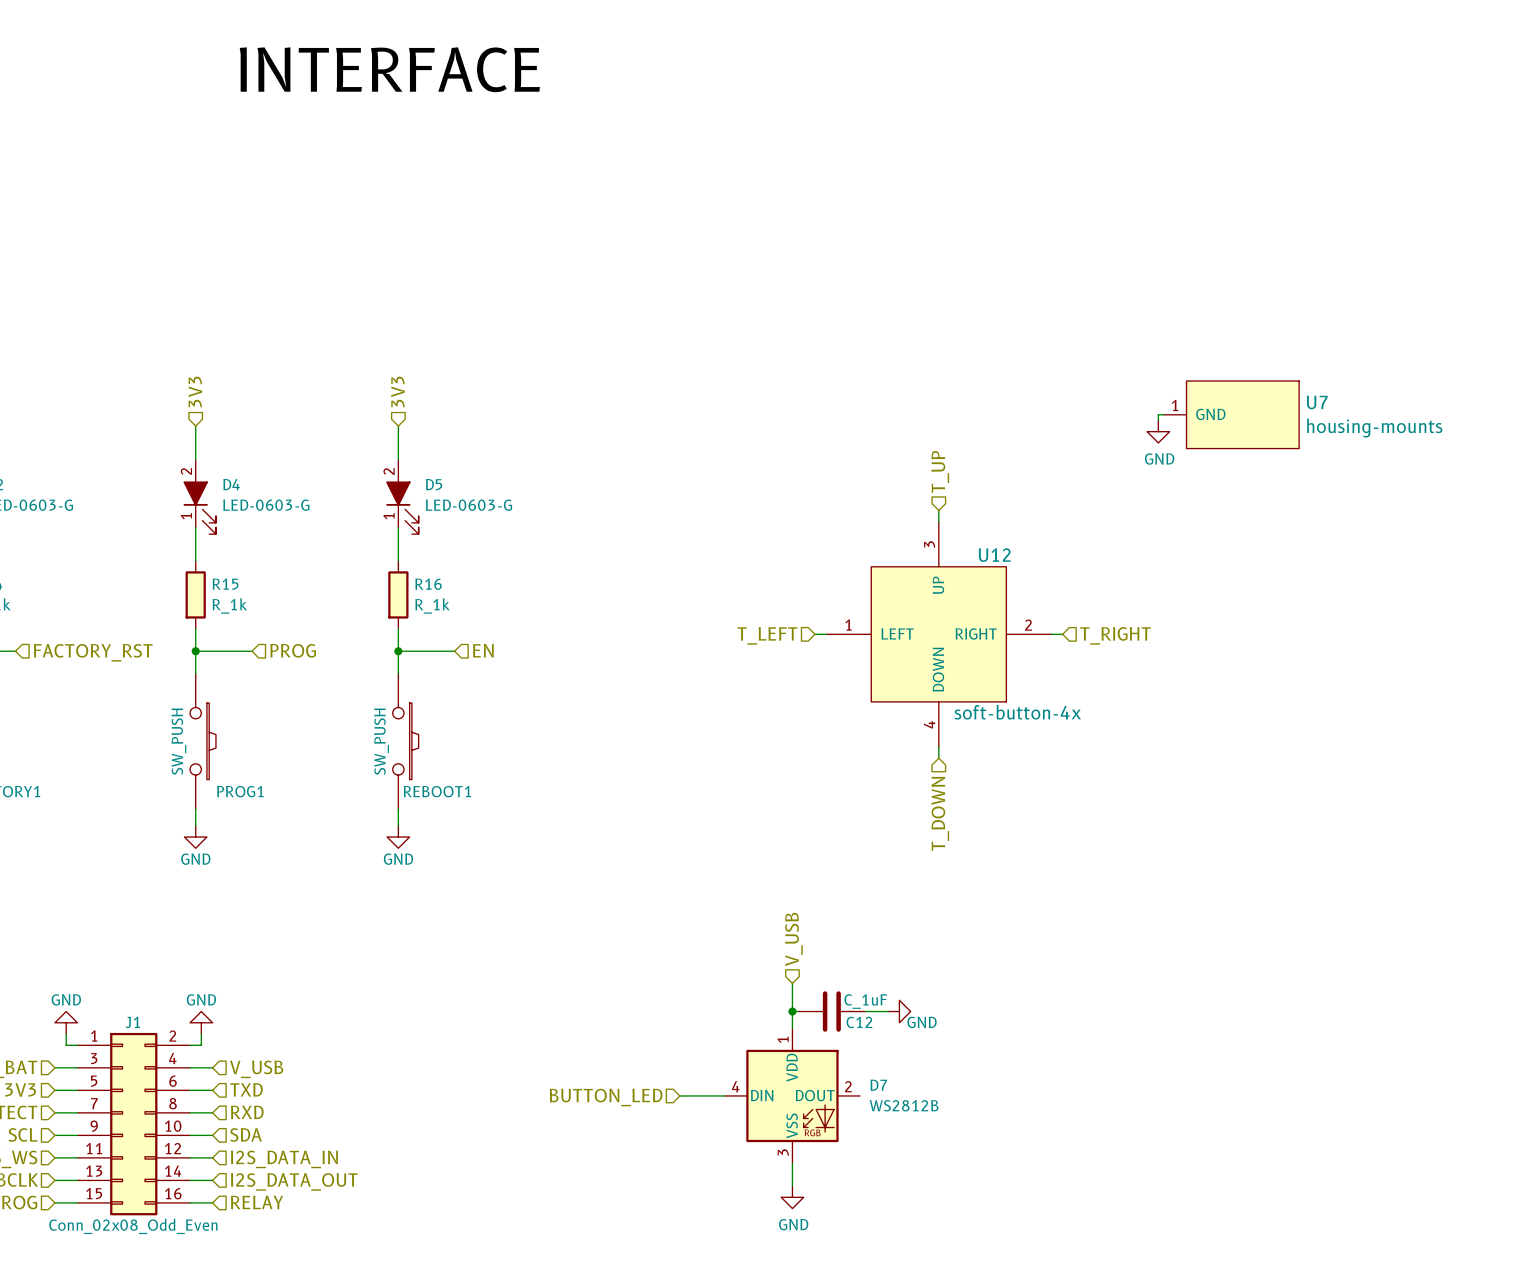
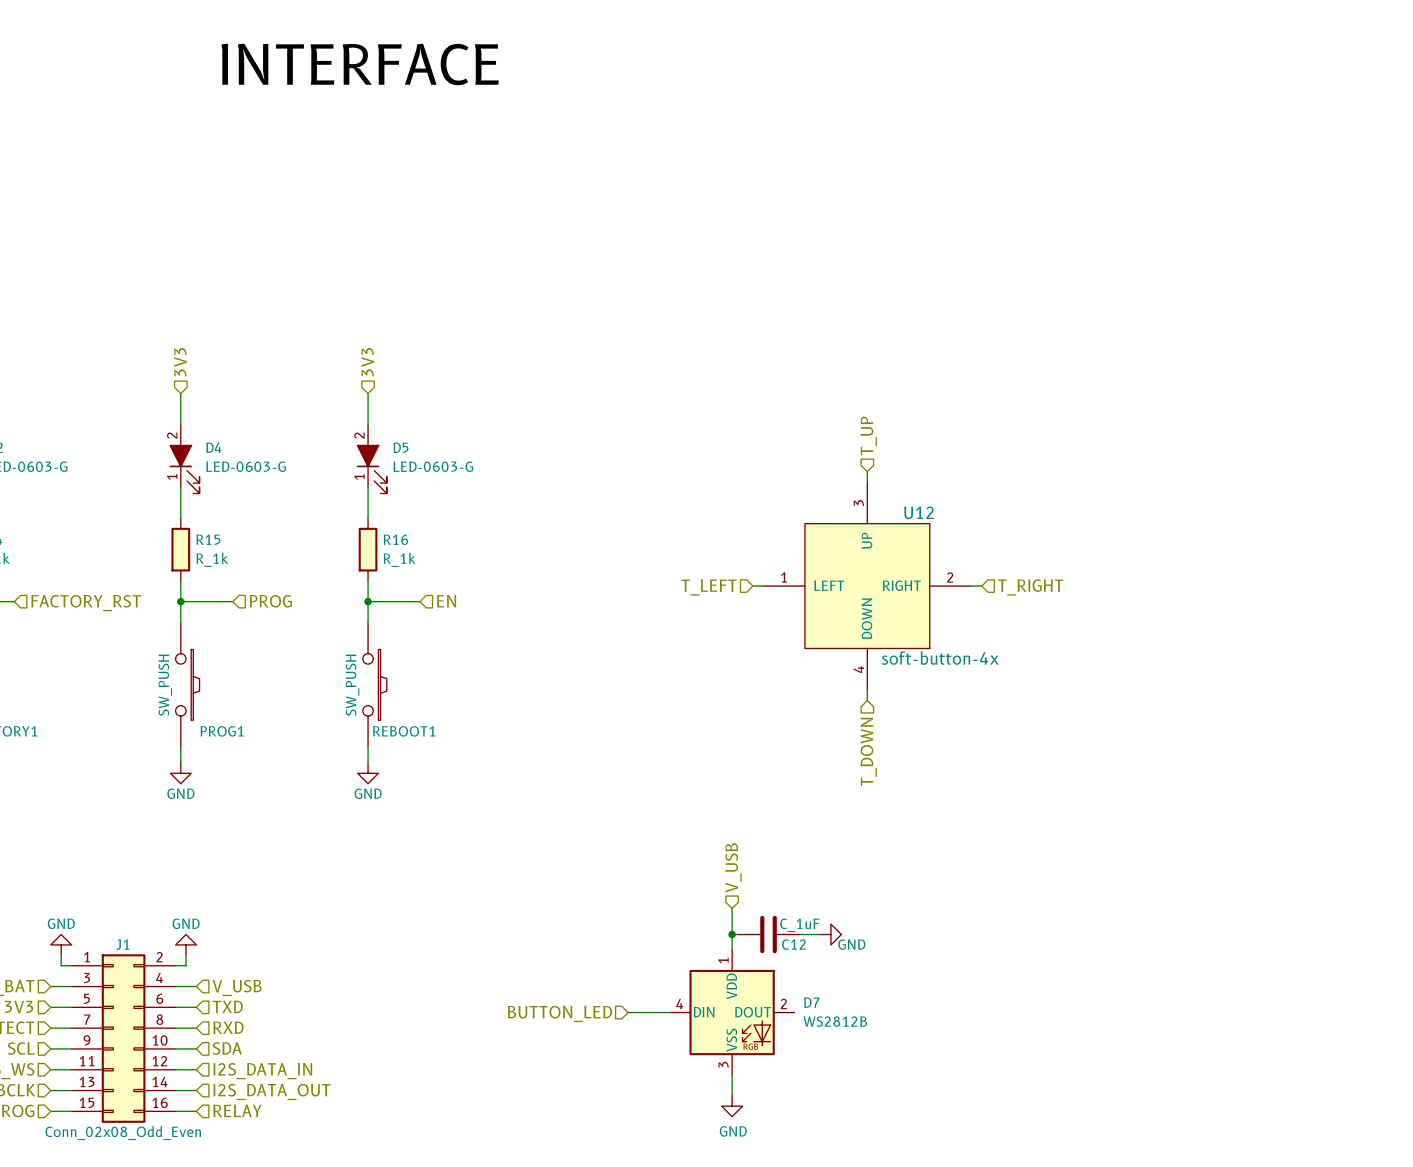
wire: (1164, 414) (1158, 414) (1158, 420) -> none
U7: housing-mounts (1231, 414) -> none
power symbol: GND (1158, 431) -> none

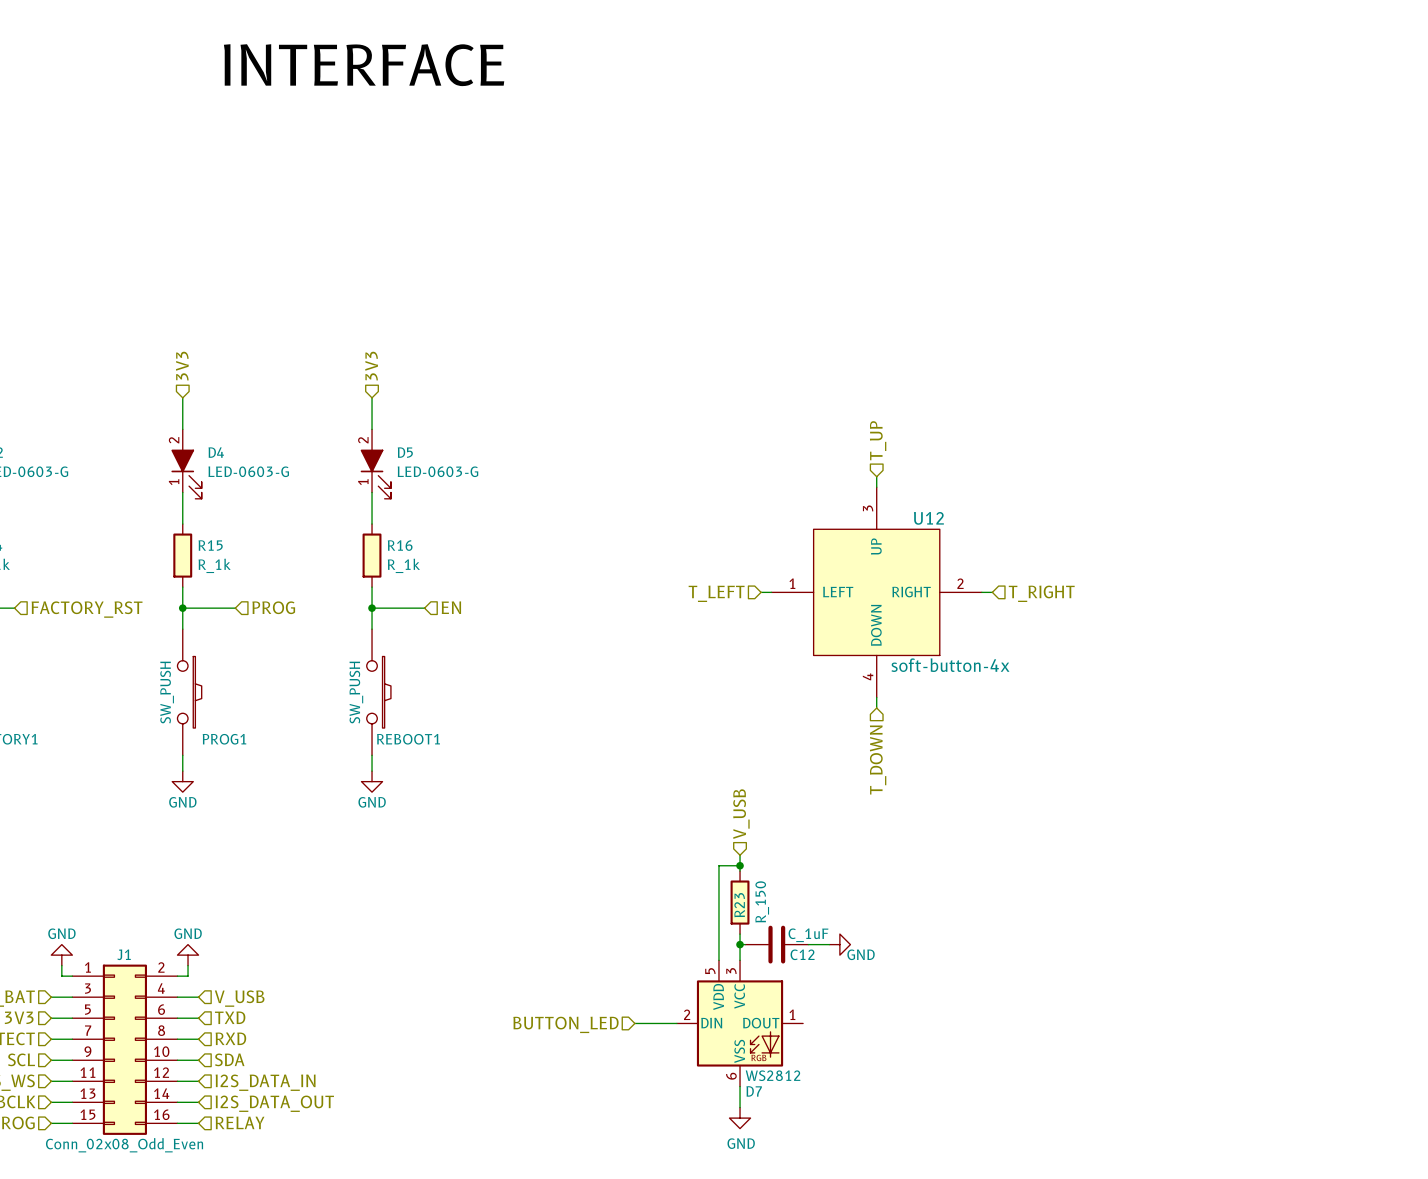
wire: none -> (740, 865) (718, 865) (718, 960)
junction: none -> (740, 865)
hierarchical label position: V_USB (733, 867) -> V_USB (741, 814)
R23: none -> R_150 (740, 902)
D7 symbol: [669, 950, 795, 1075] -> [676, 960, 804, 1087]
D7 name position: D7 (811, 1002) -> D7 (754, 1091)
D7 value: WS2812B (835, 1021) -> WS2812 (773, 1075)

